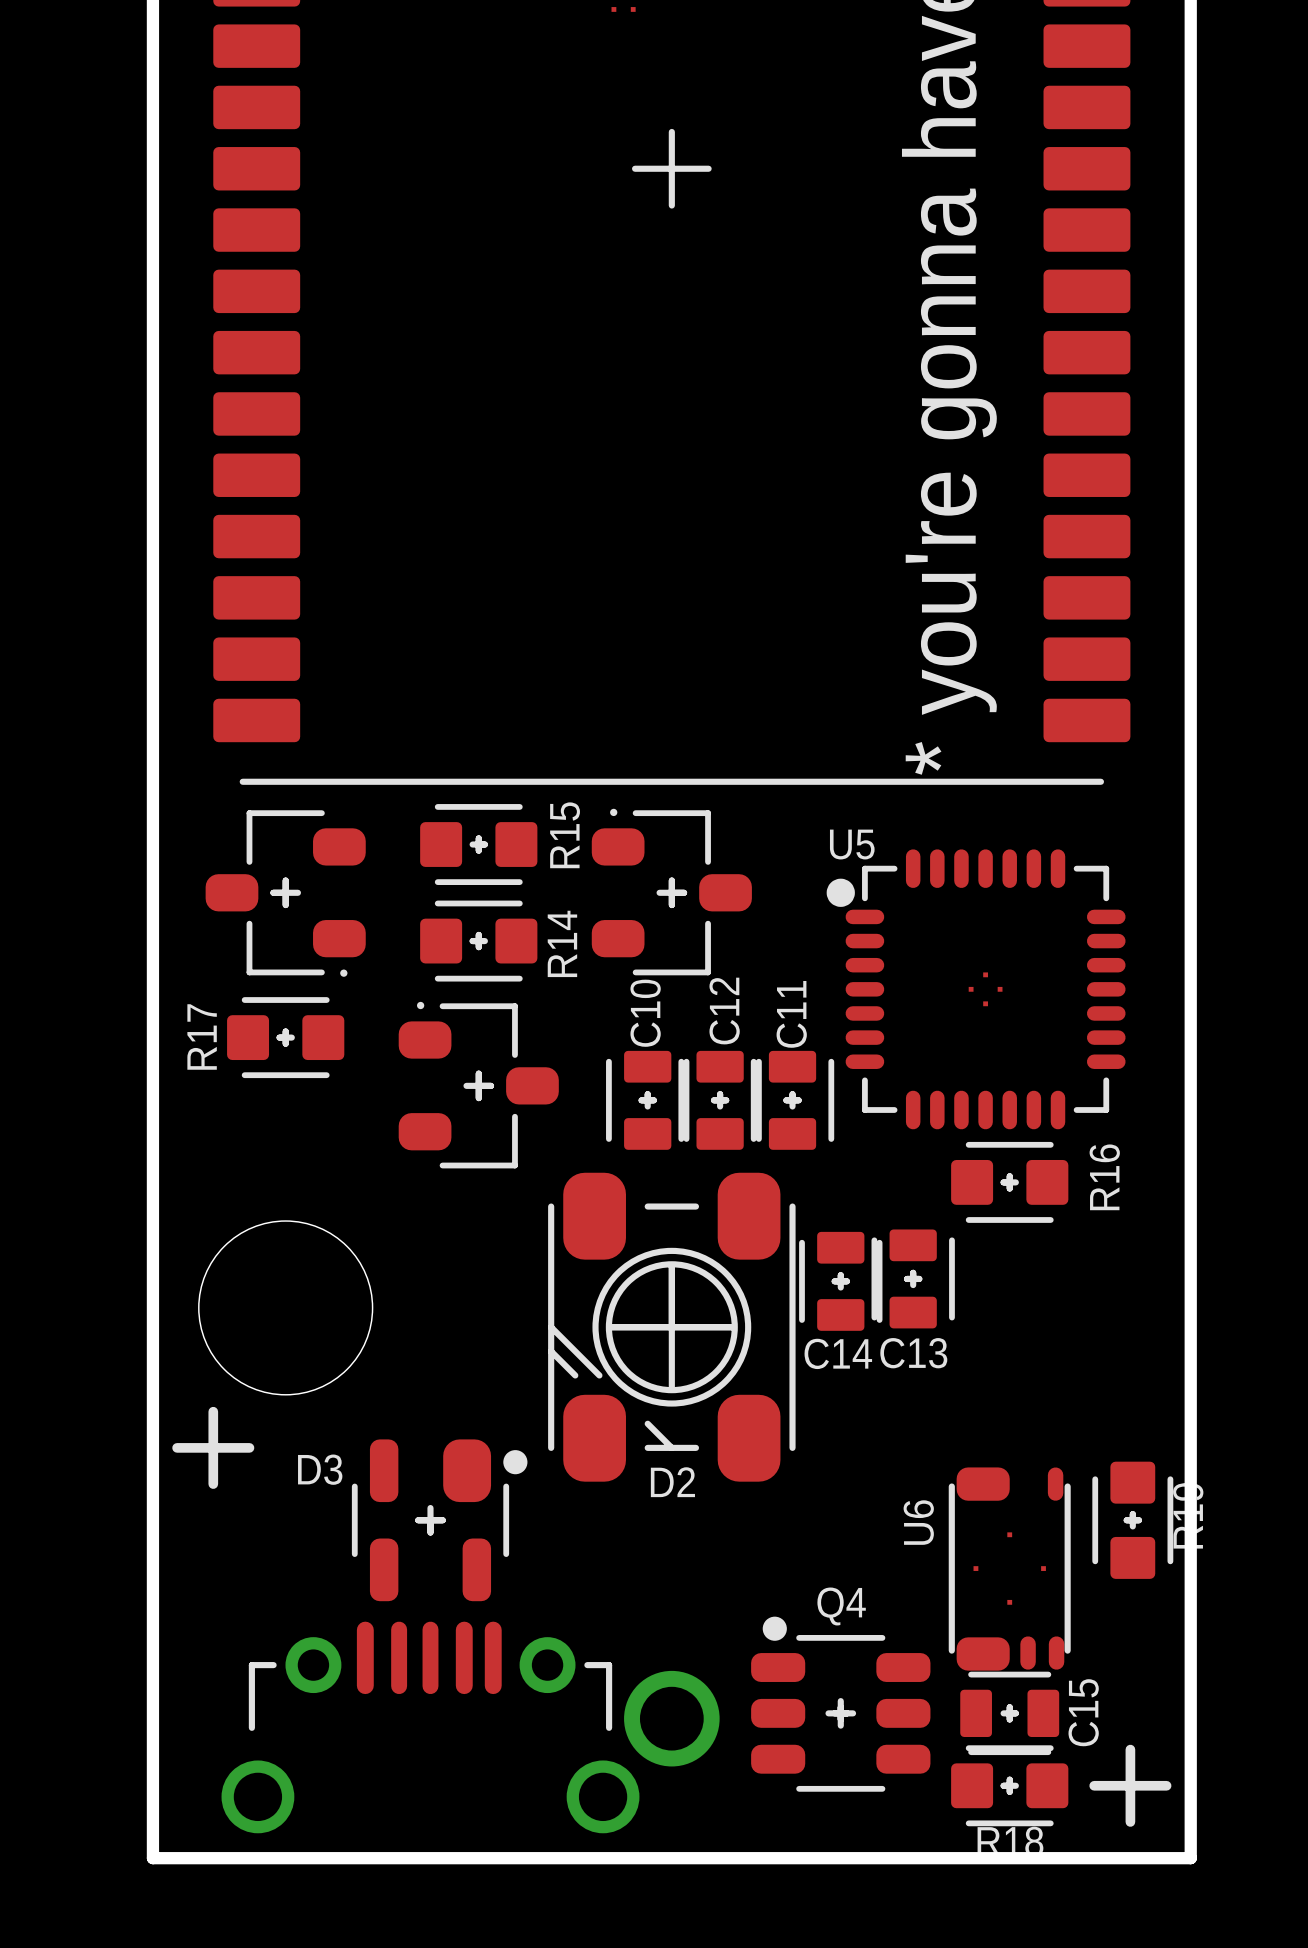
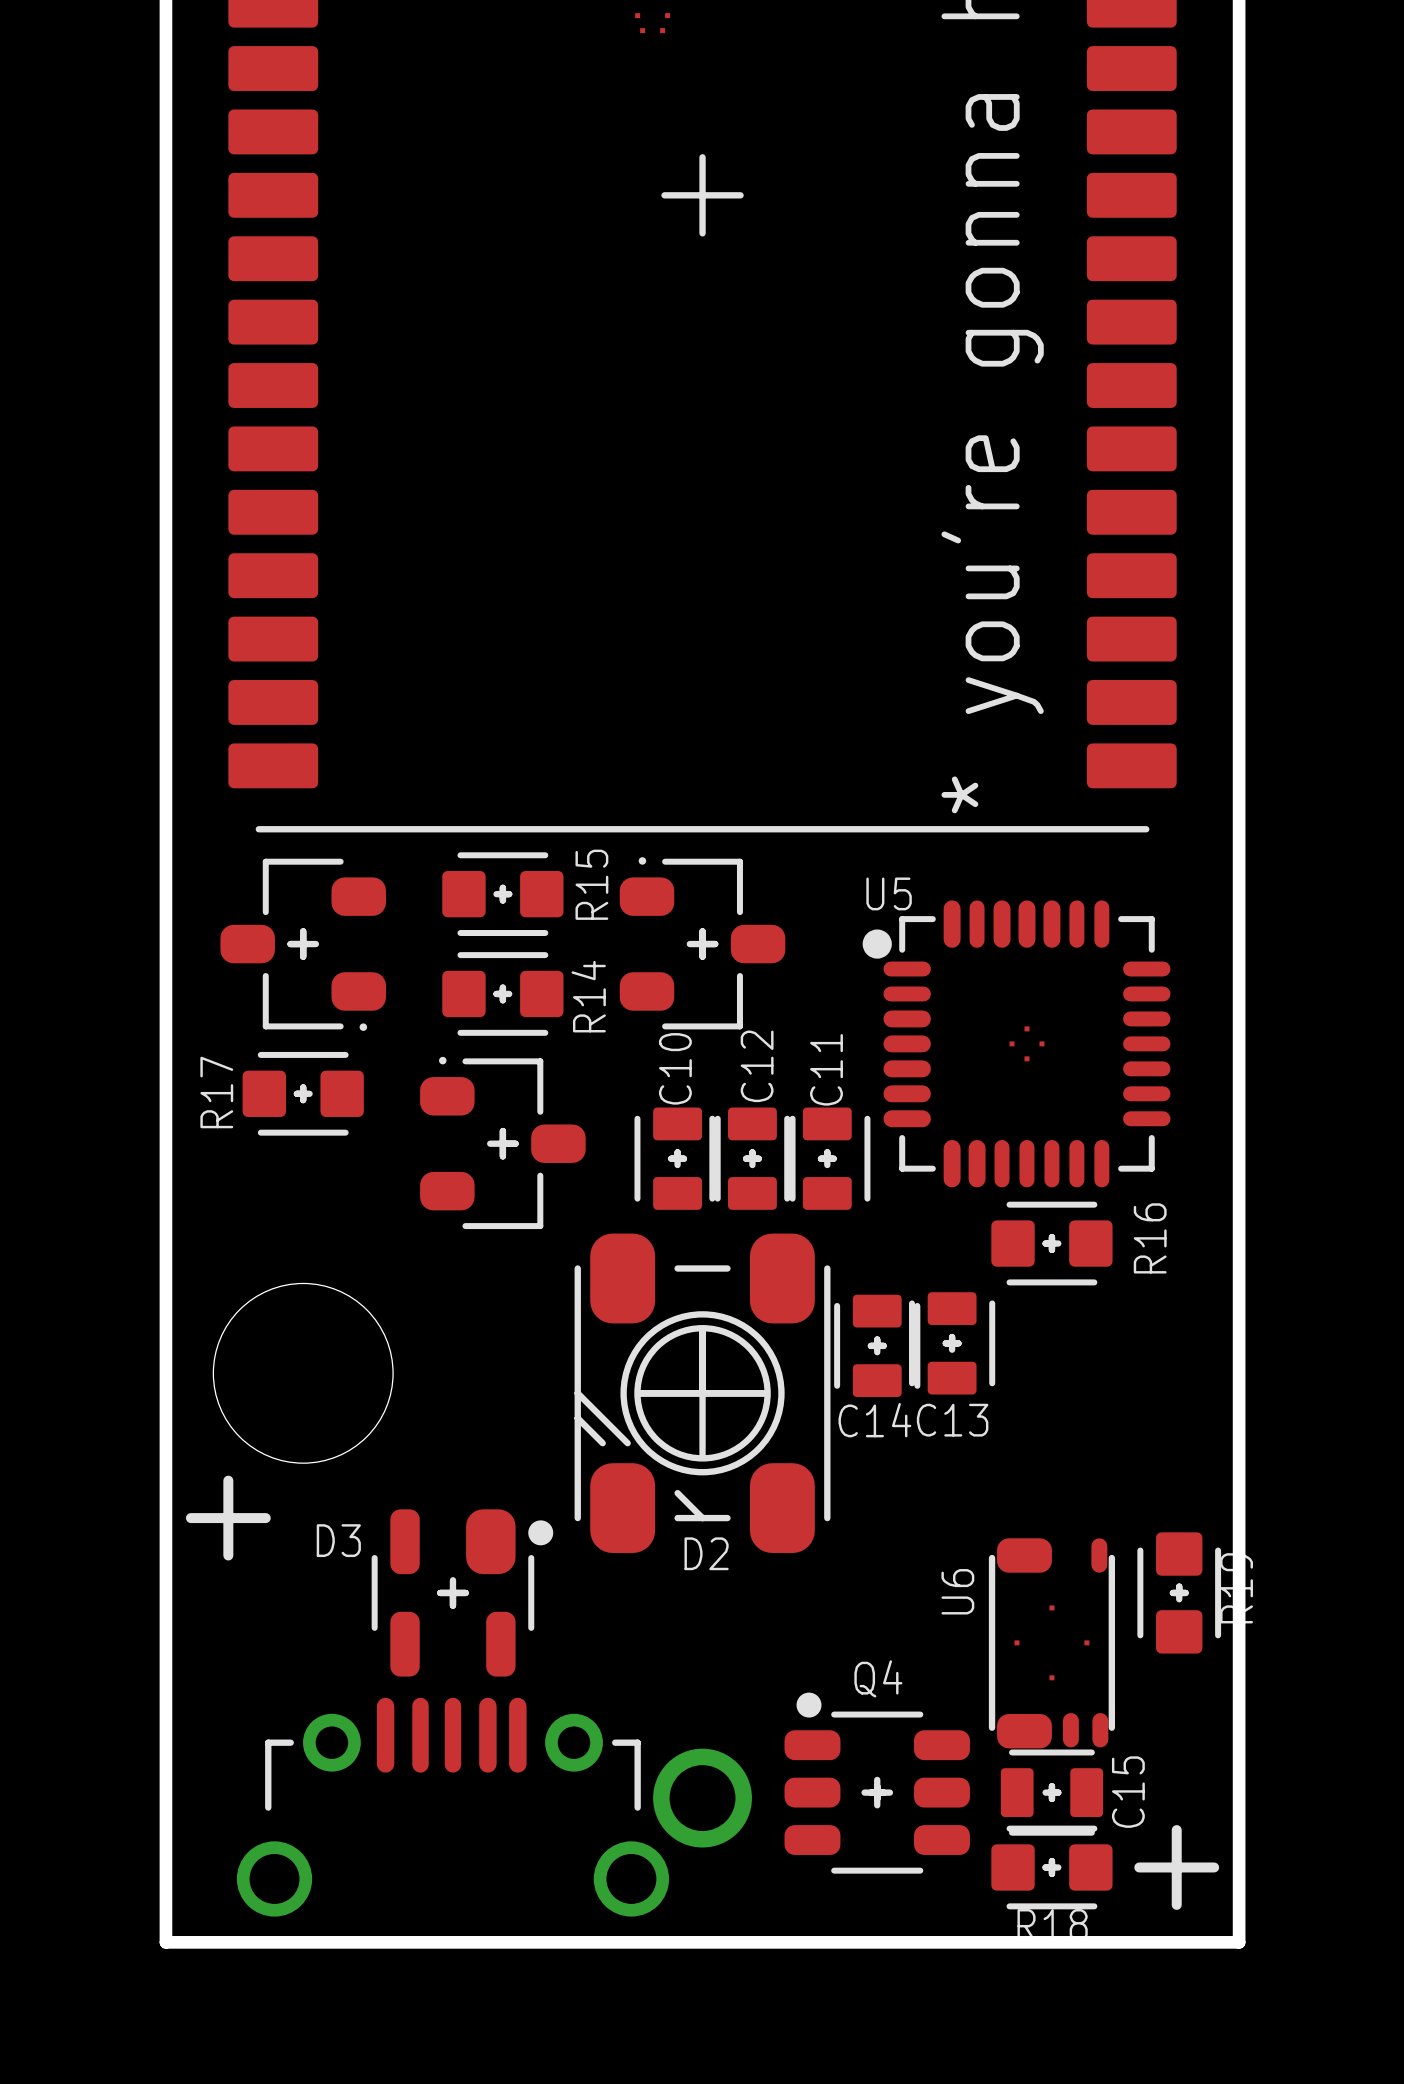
U5 footprint: [845, 849, 1126, 1130] -> [882, 900, 1171, 1188]

